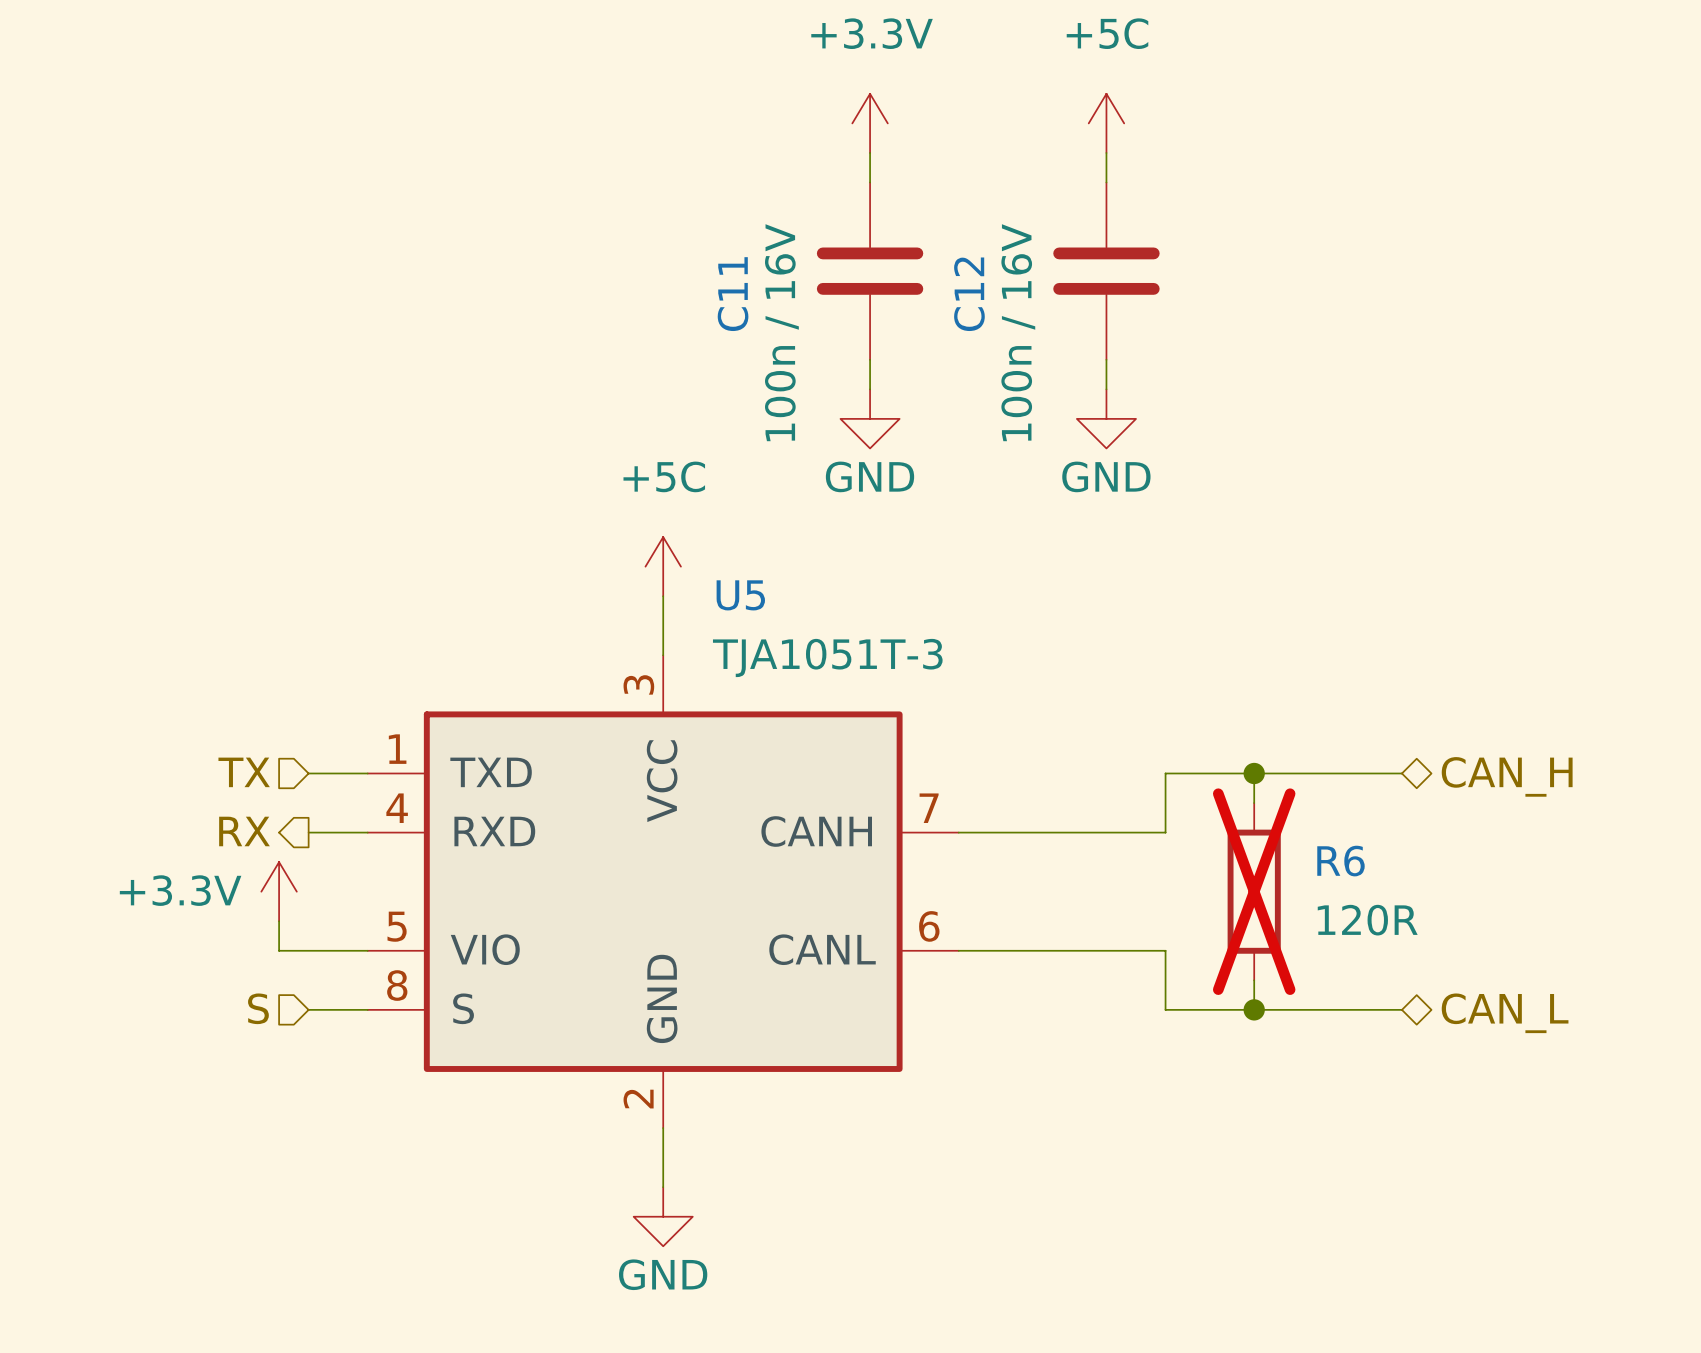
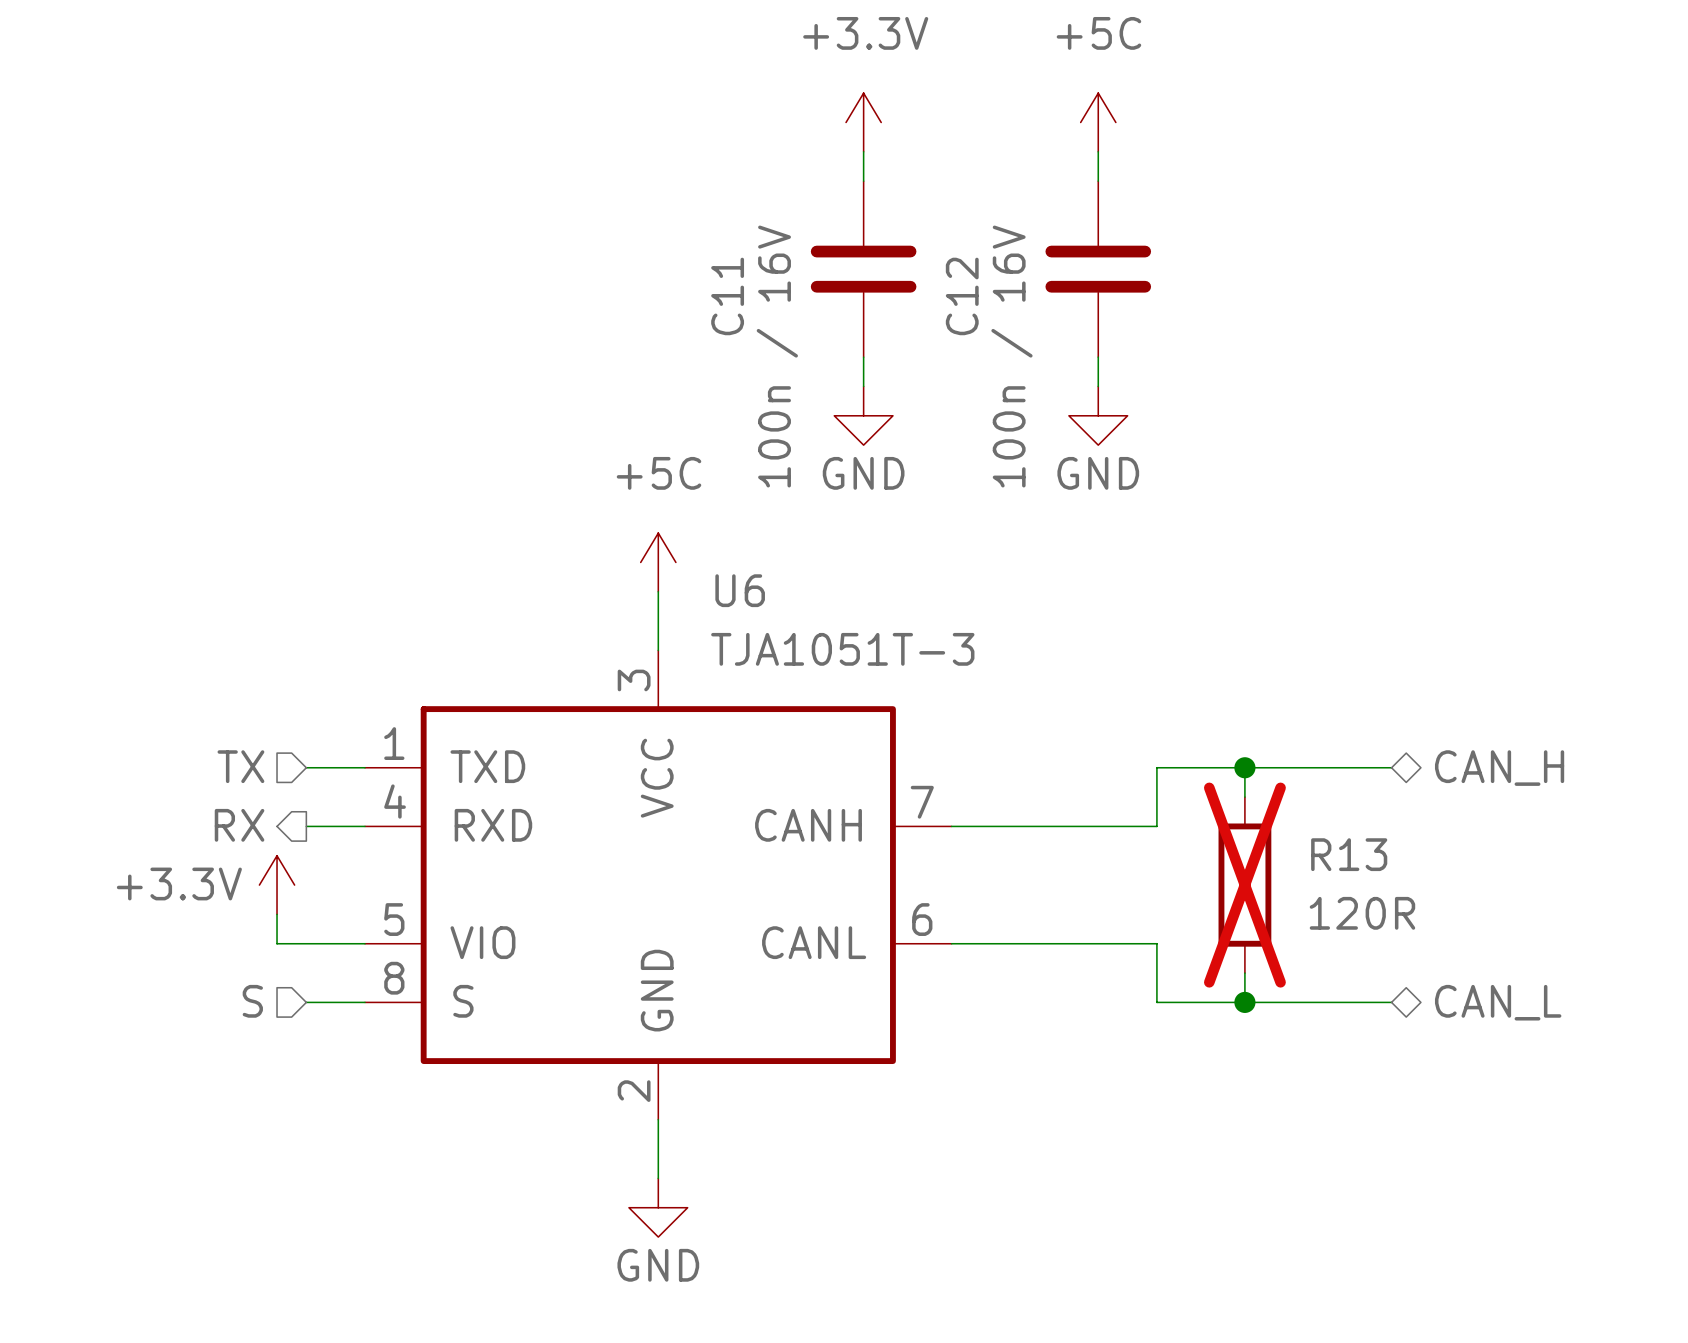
U5 name: U5 (740, 595) -> U6 (740, 590)
R6 name: R6 (1340, 861) -> R13 (1349, 854)

